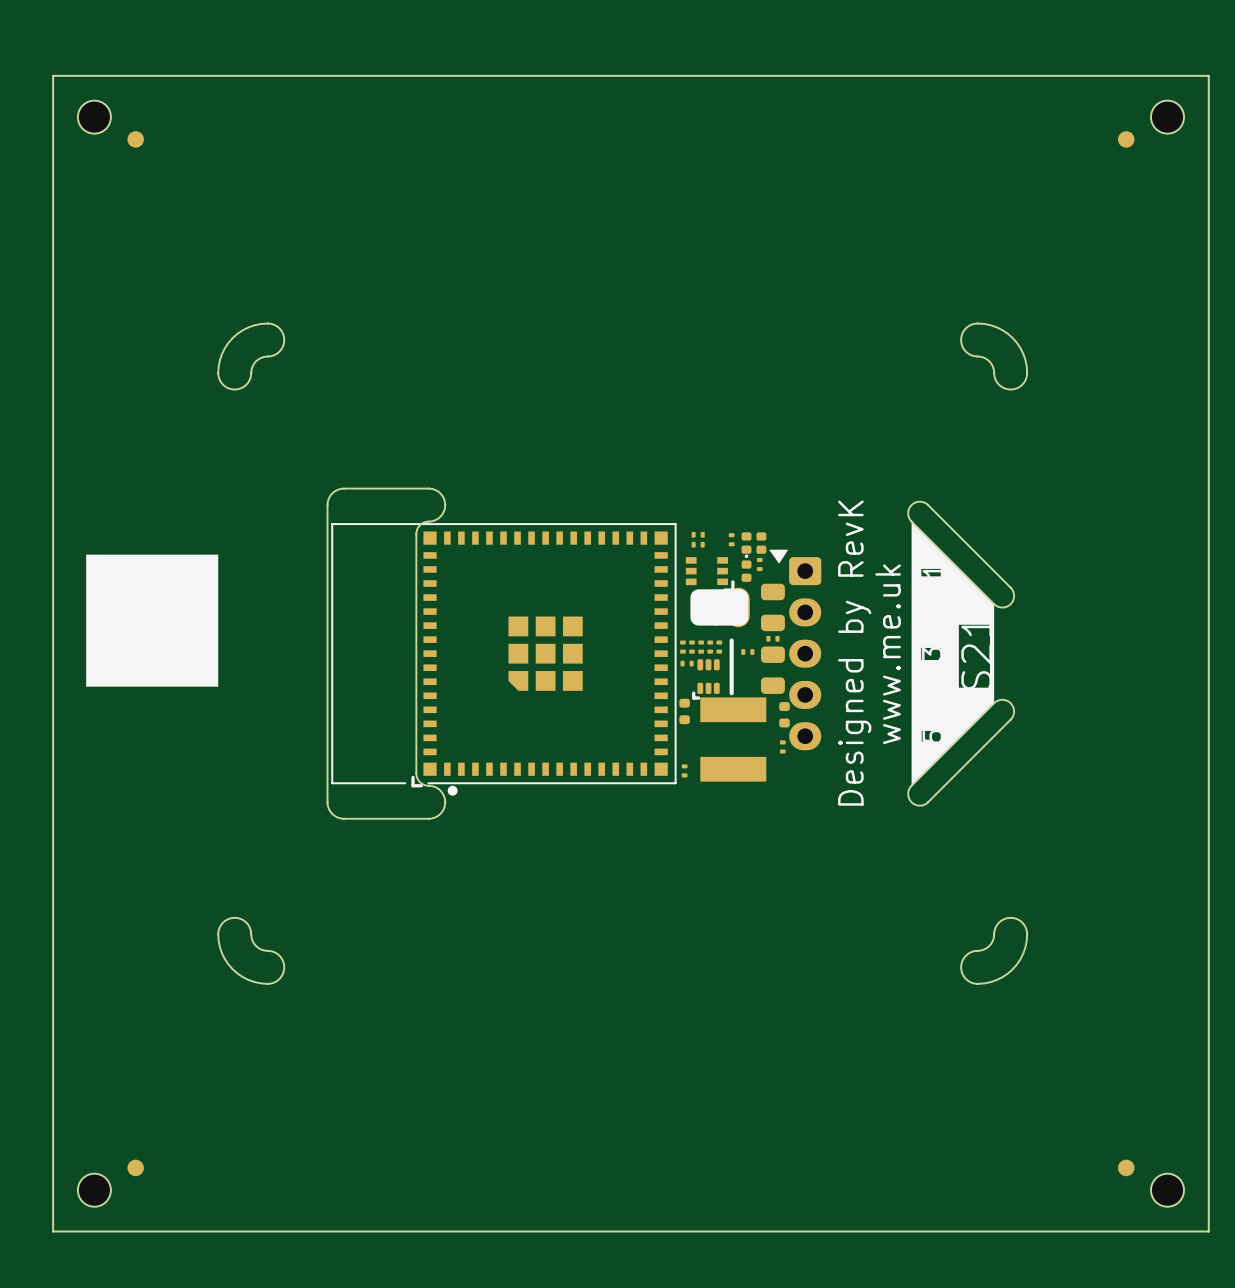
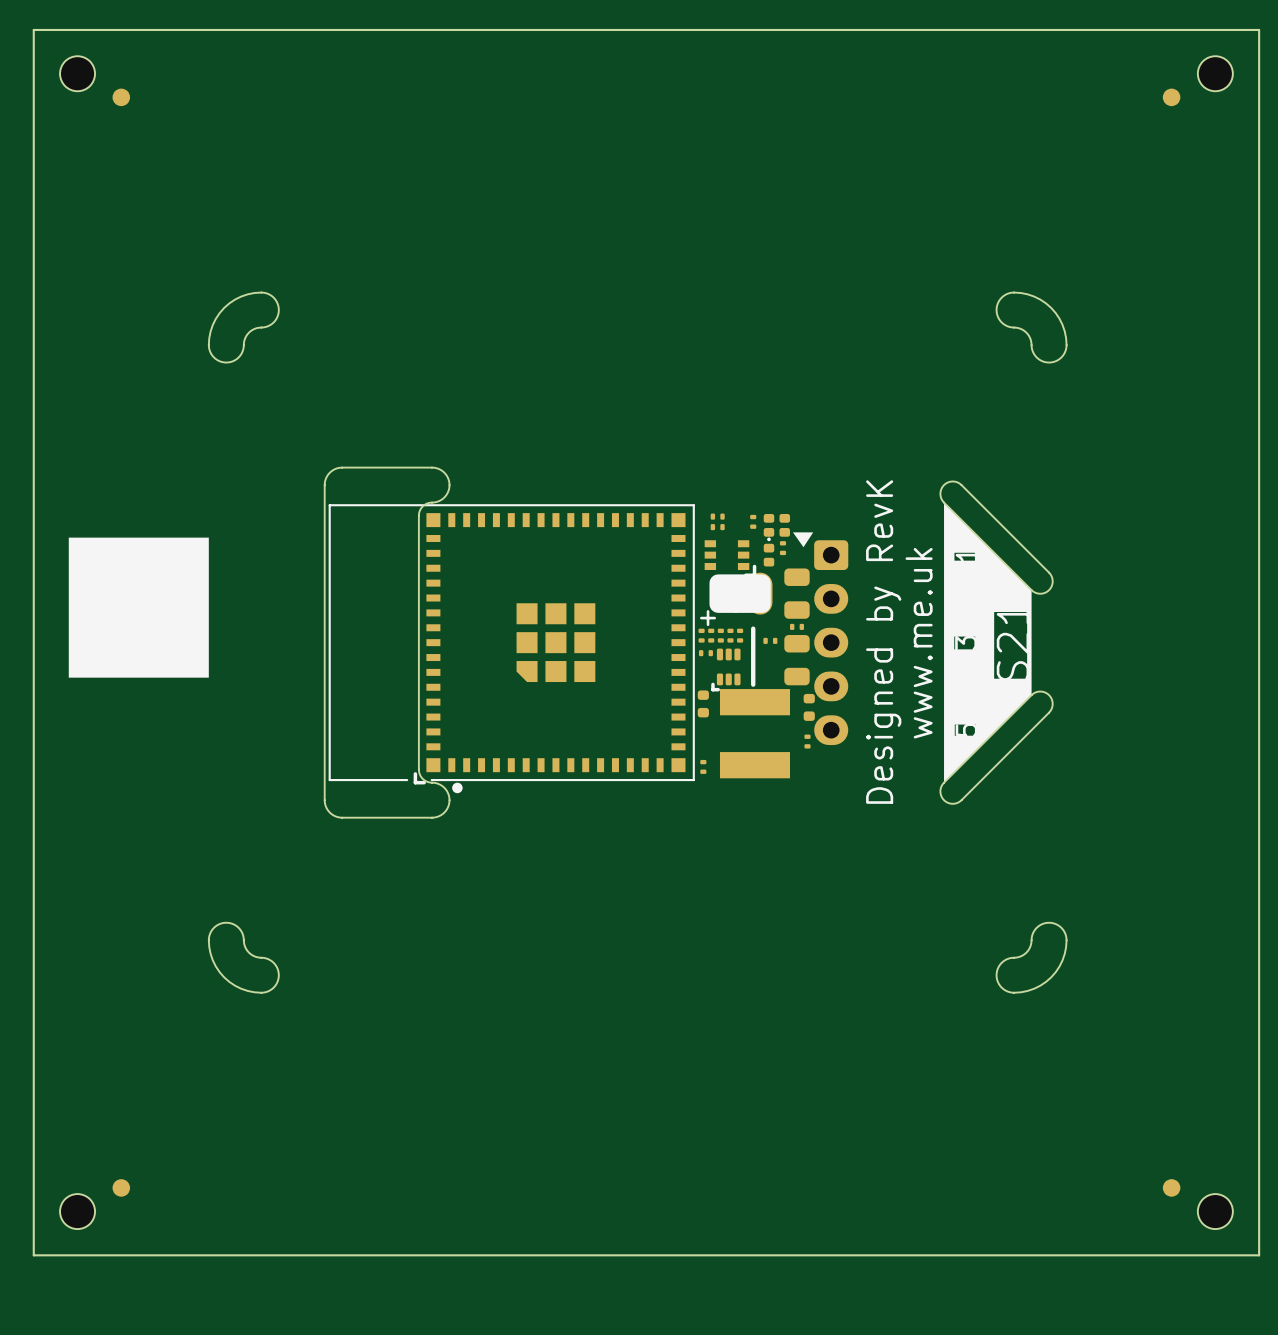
text: none -> + (708, 618)

